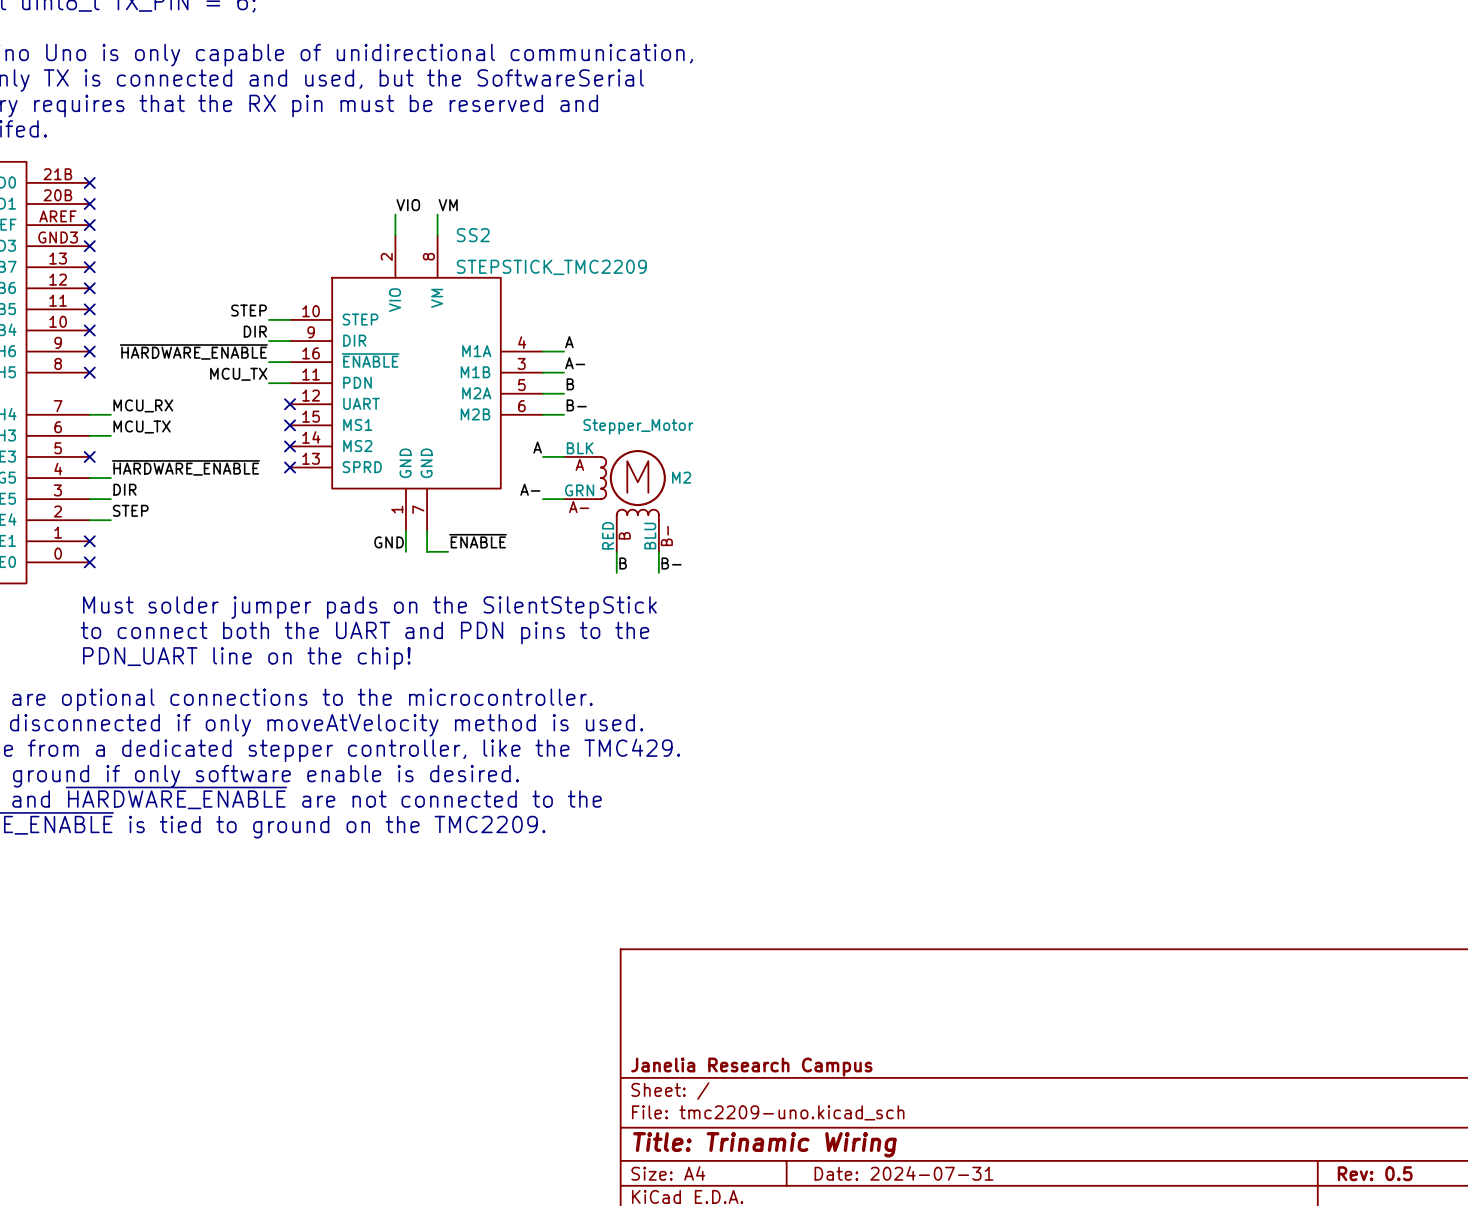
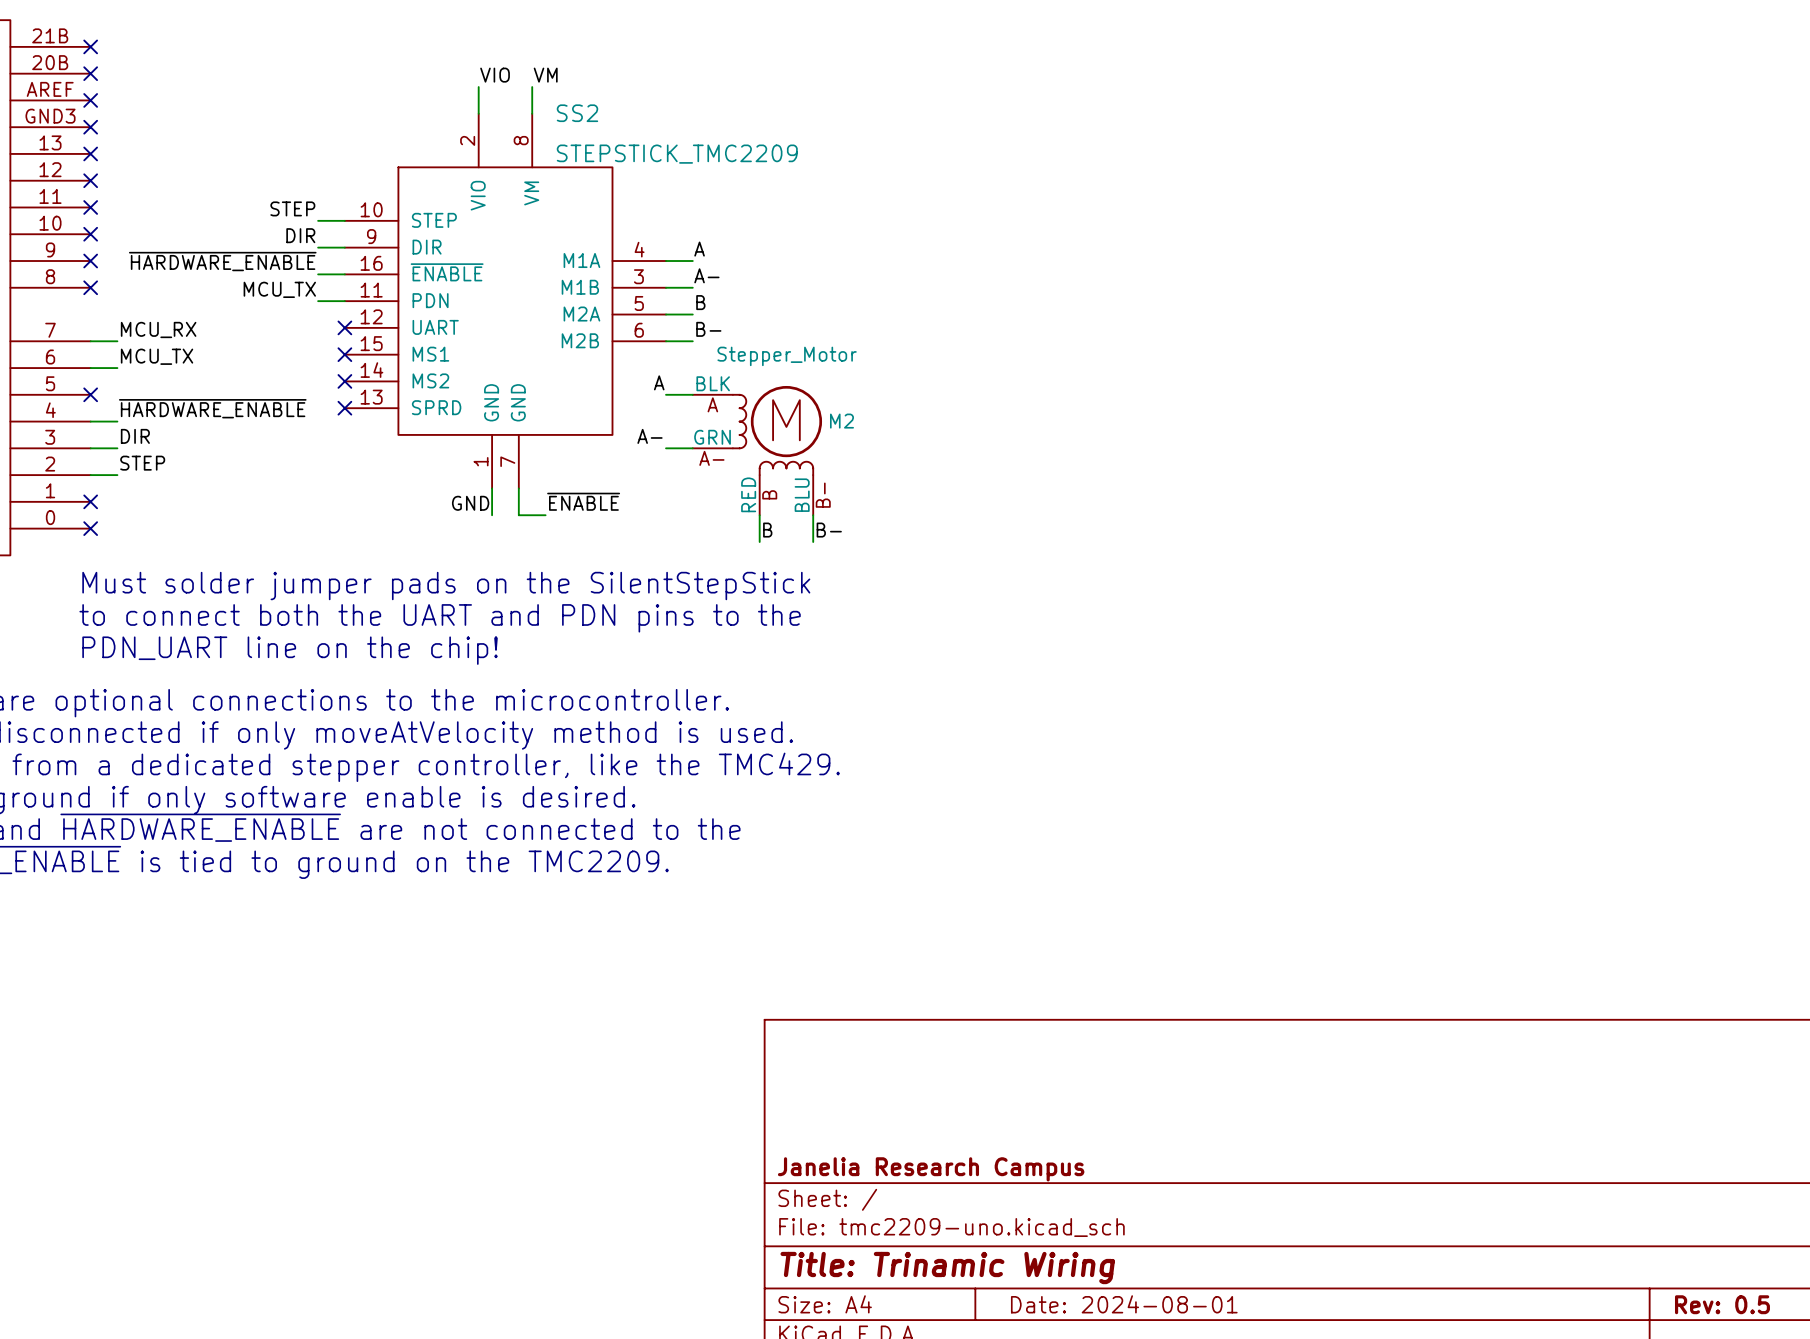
title block: Date: 2024-07-31 (903, 1173) -> Date: 2024-08-01 (1124, 1304)

